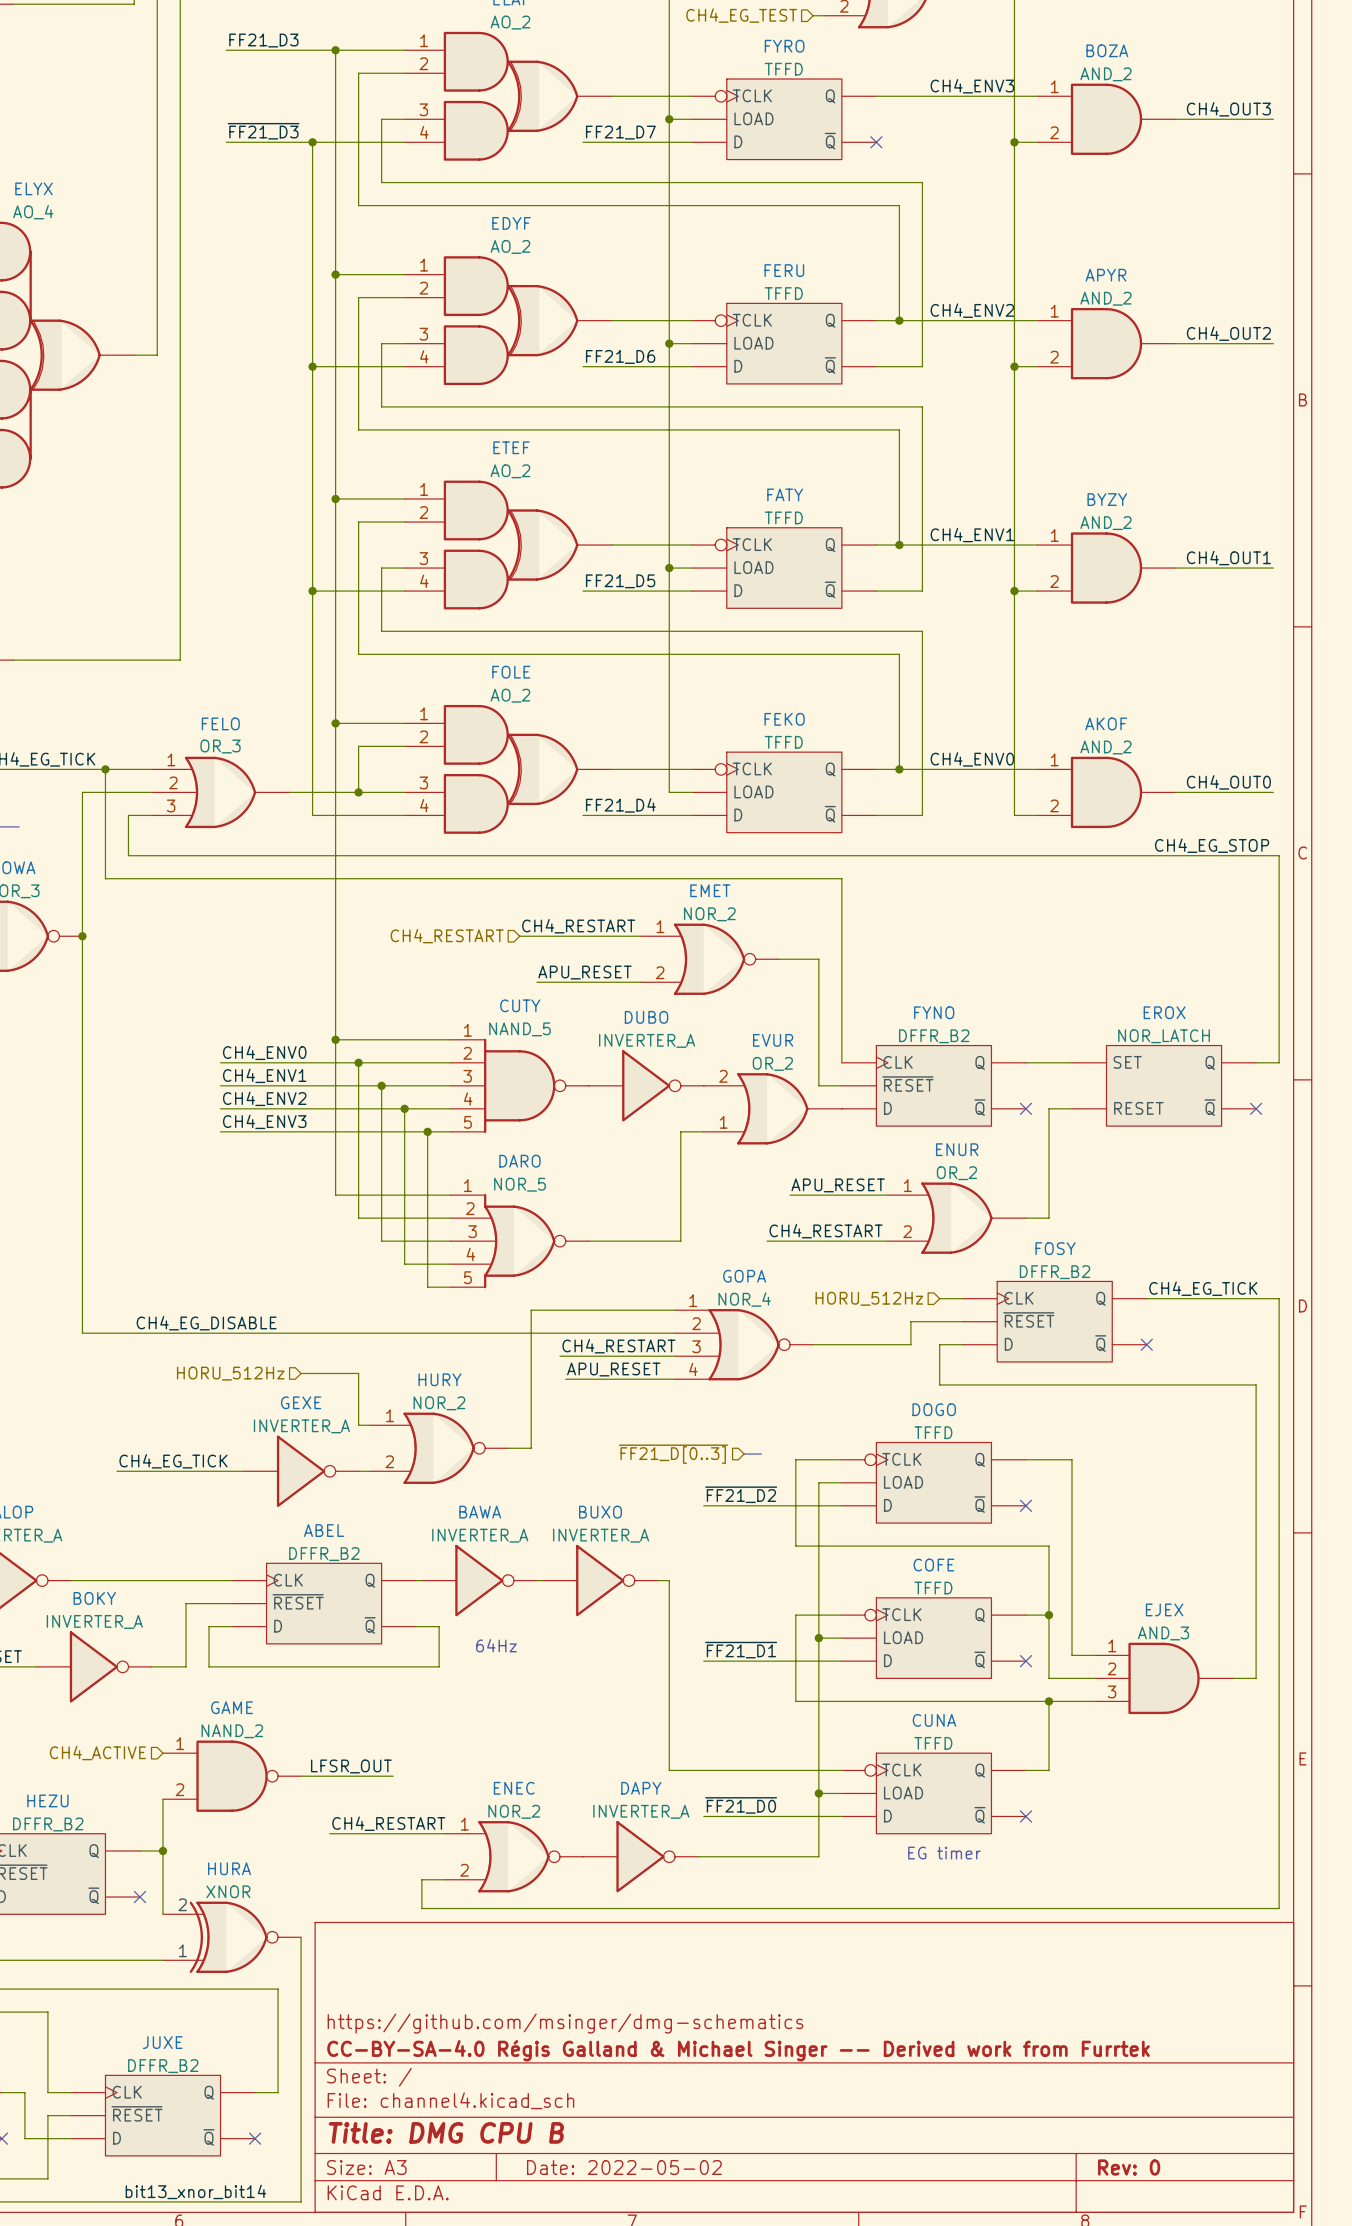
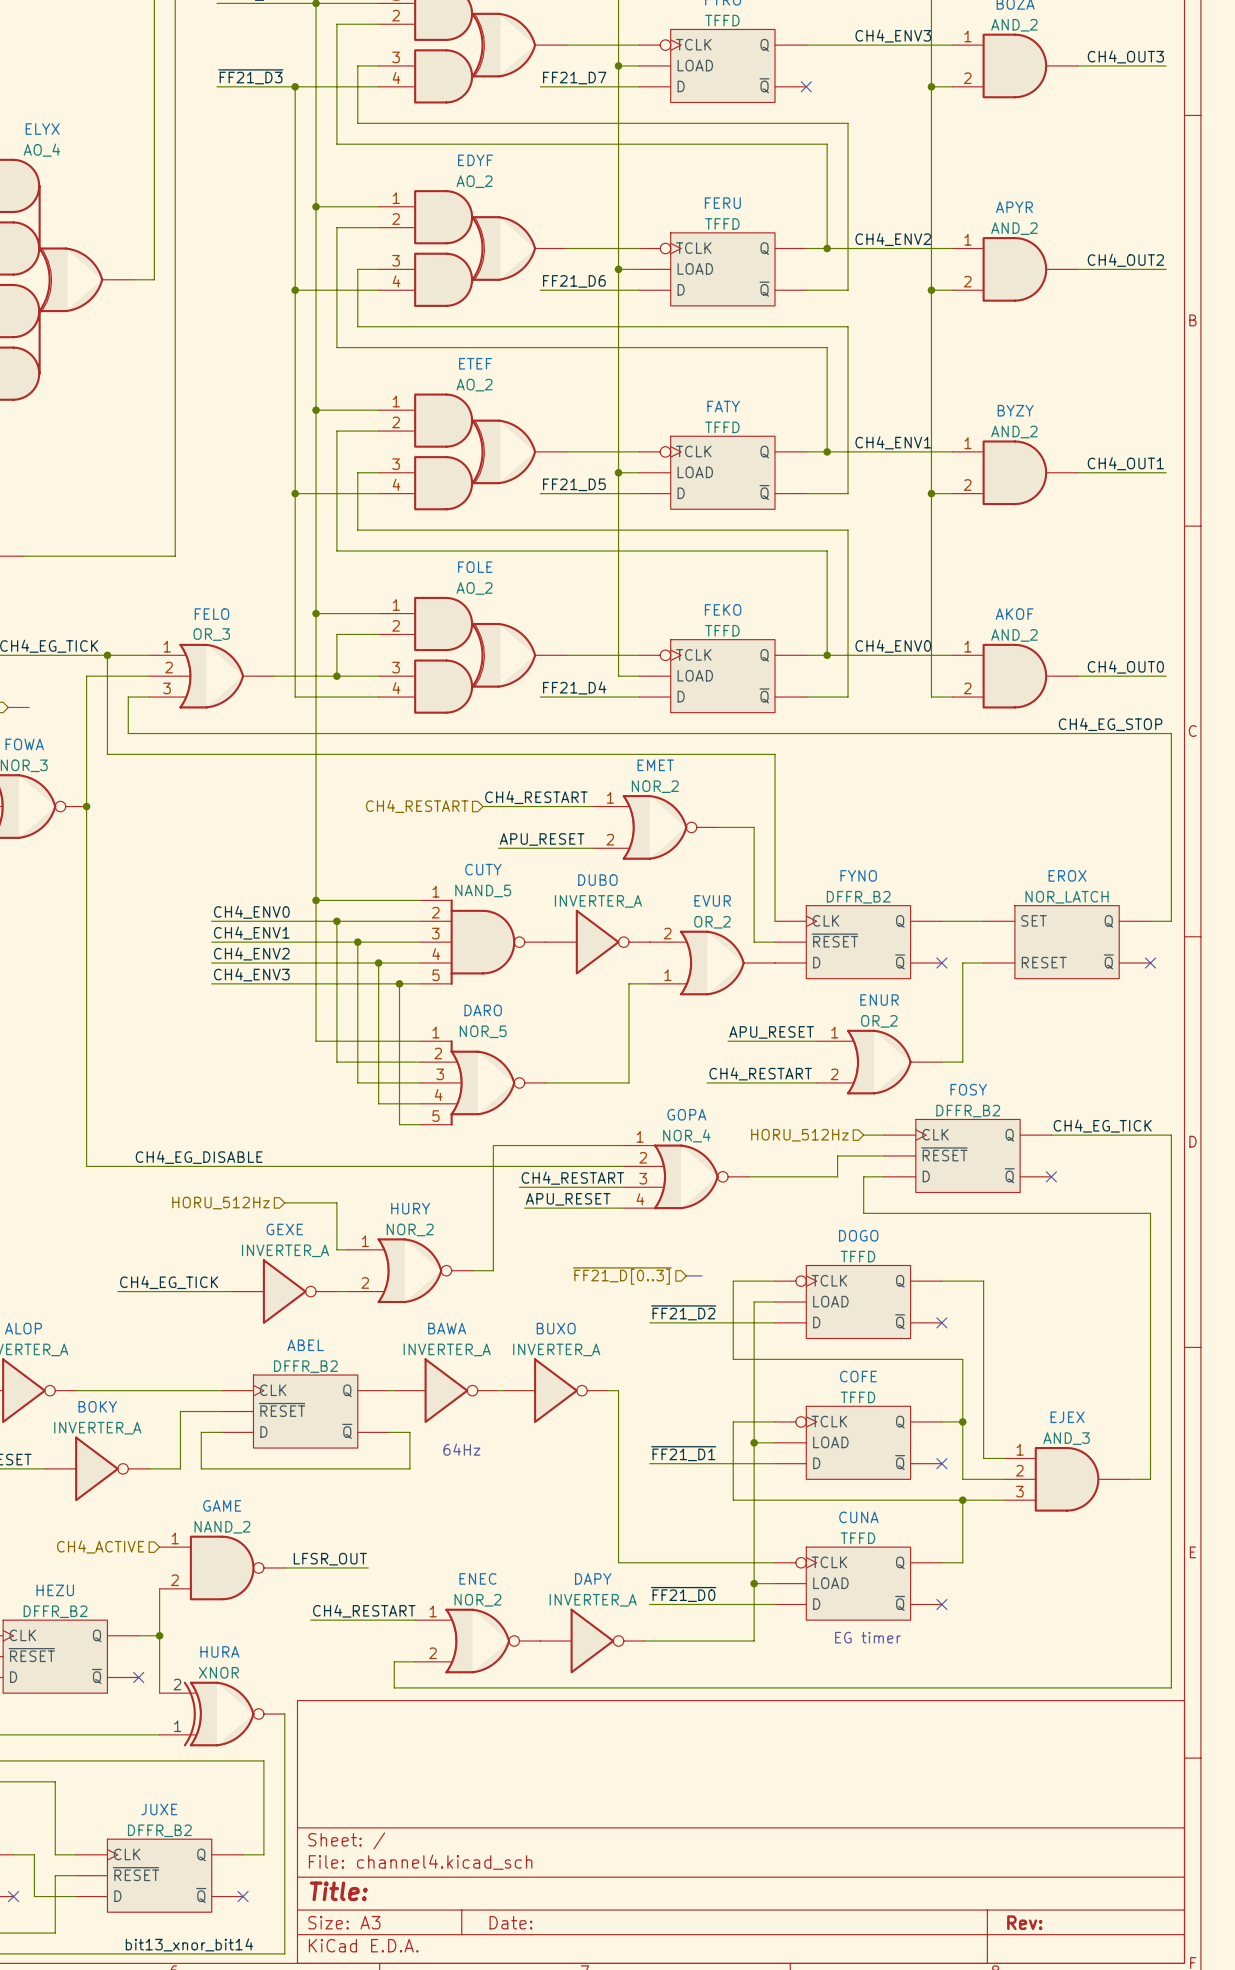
title block: https://github.com/msinger/dmg-schematics (565, 2023) -> none
title block: CC-BY-SA-4.0 Régis Galland & Michael Singer -- Derived work from Furrtek (738, 2050) -> none
title block: Title: DMG CPU B (446, 2132) -> Title: (338, 1891)
title block: Date: 2022-05-02 (624, 2167) -> Date: (510, 1922)
title block: Rev: 0 (1129, 2167) -> Rev: (1024, 1922)

